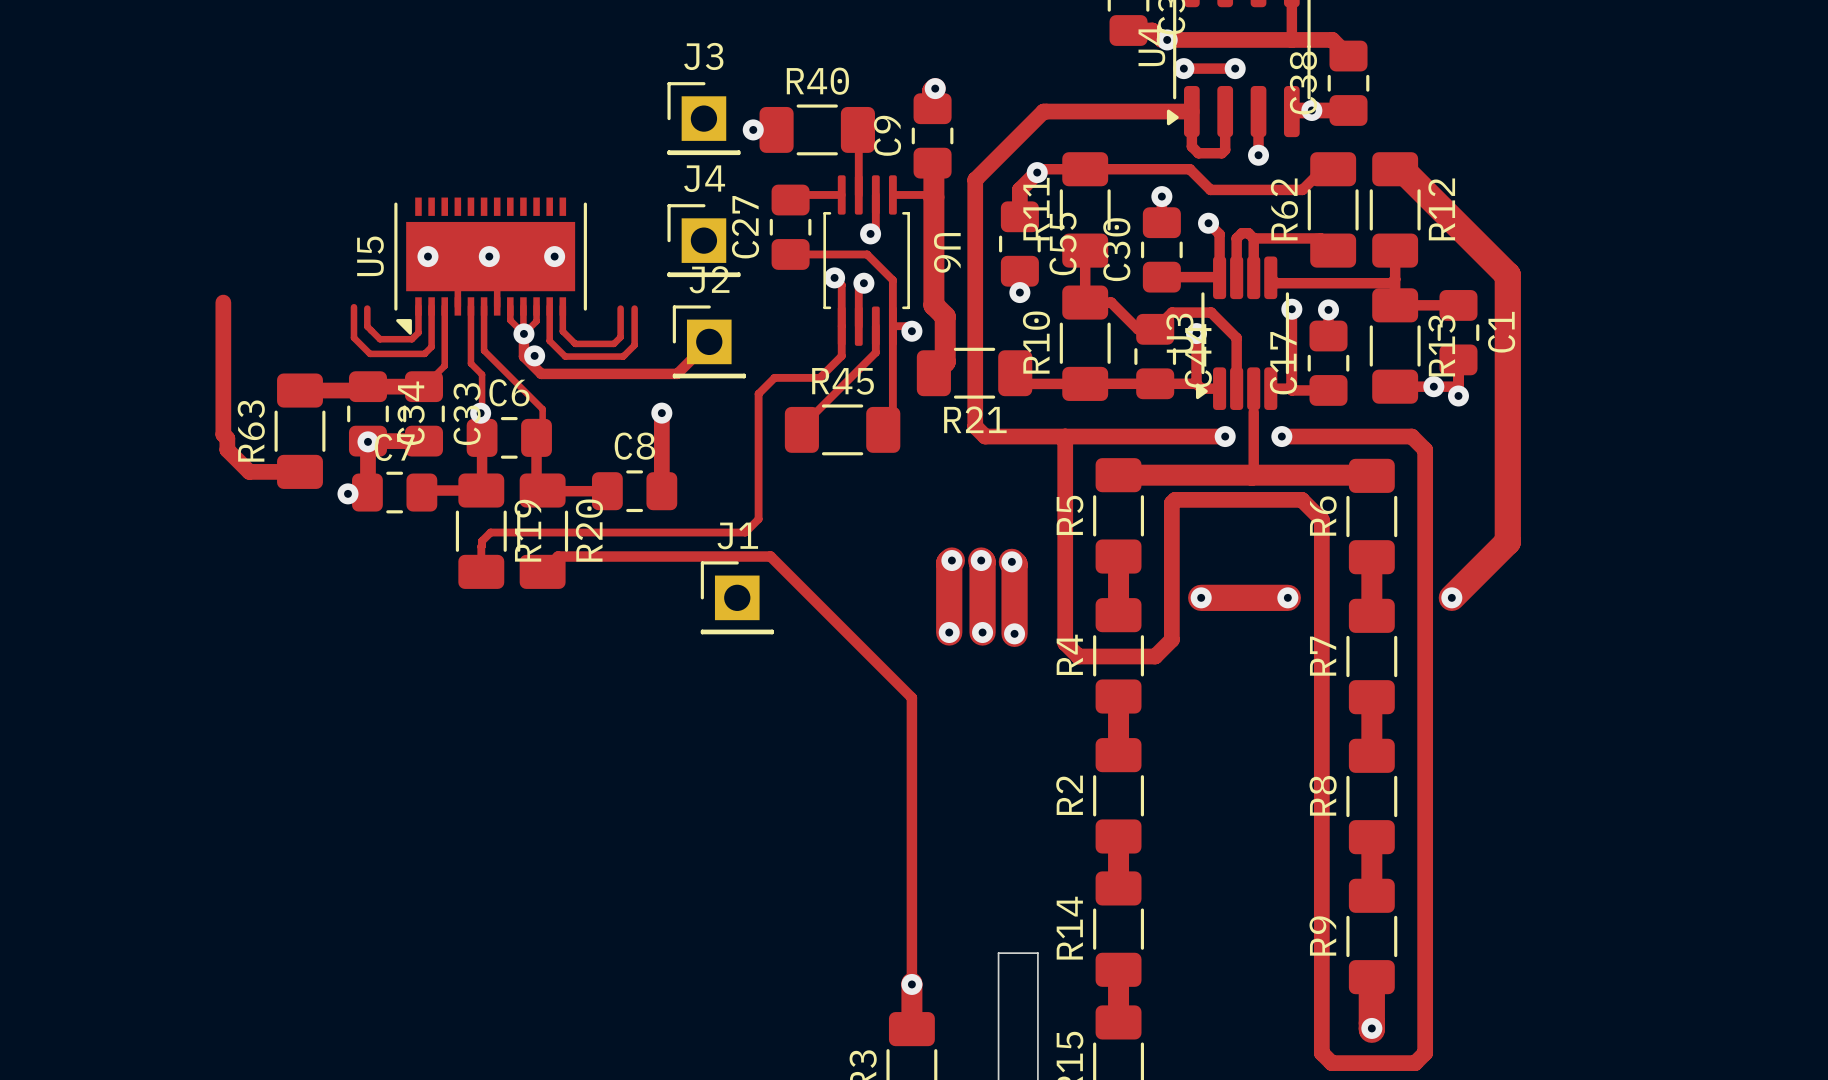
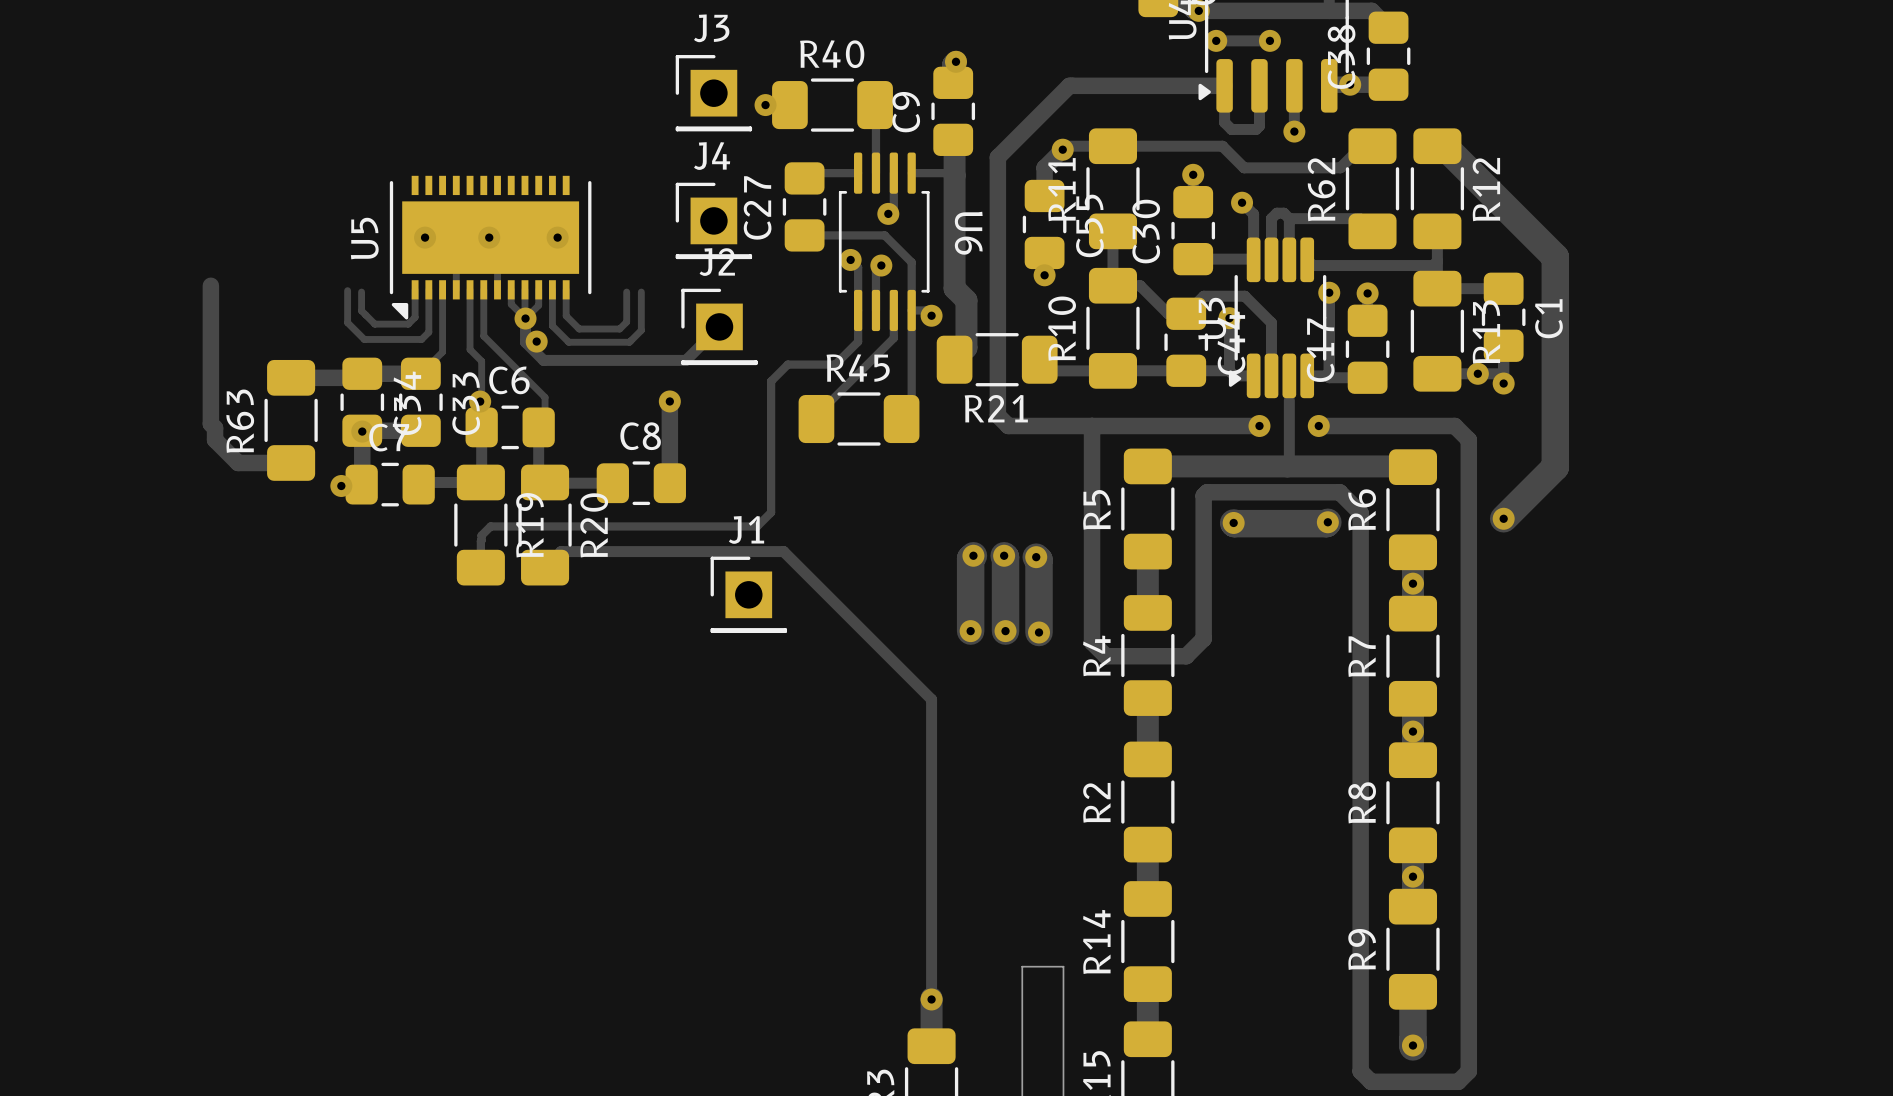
track: (1507, 475) (1507, 541) (1451, 597) -> (1555, 467) (1503, 518)
via: none -> (1503, 518)
track: none -> (1327, 522) (1233, 522)
via: none -> (1327, 522)
via: none -> (1233, 522)
via: none -> (1412, 583)
track: (1201, 597) (1287, 597) -> none
via: (1201, 597) -> none
via: (1287, 597) -> none
via: (1451, 597) -> none
via: none -> (1412, 731)
via: none -> (1412, 876)

